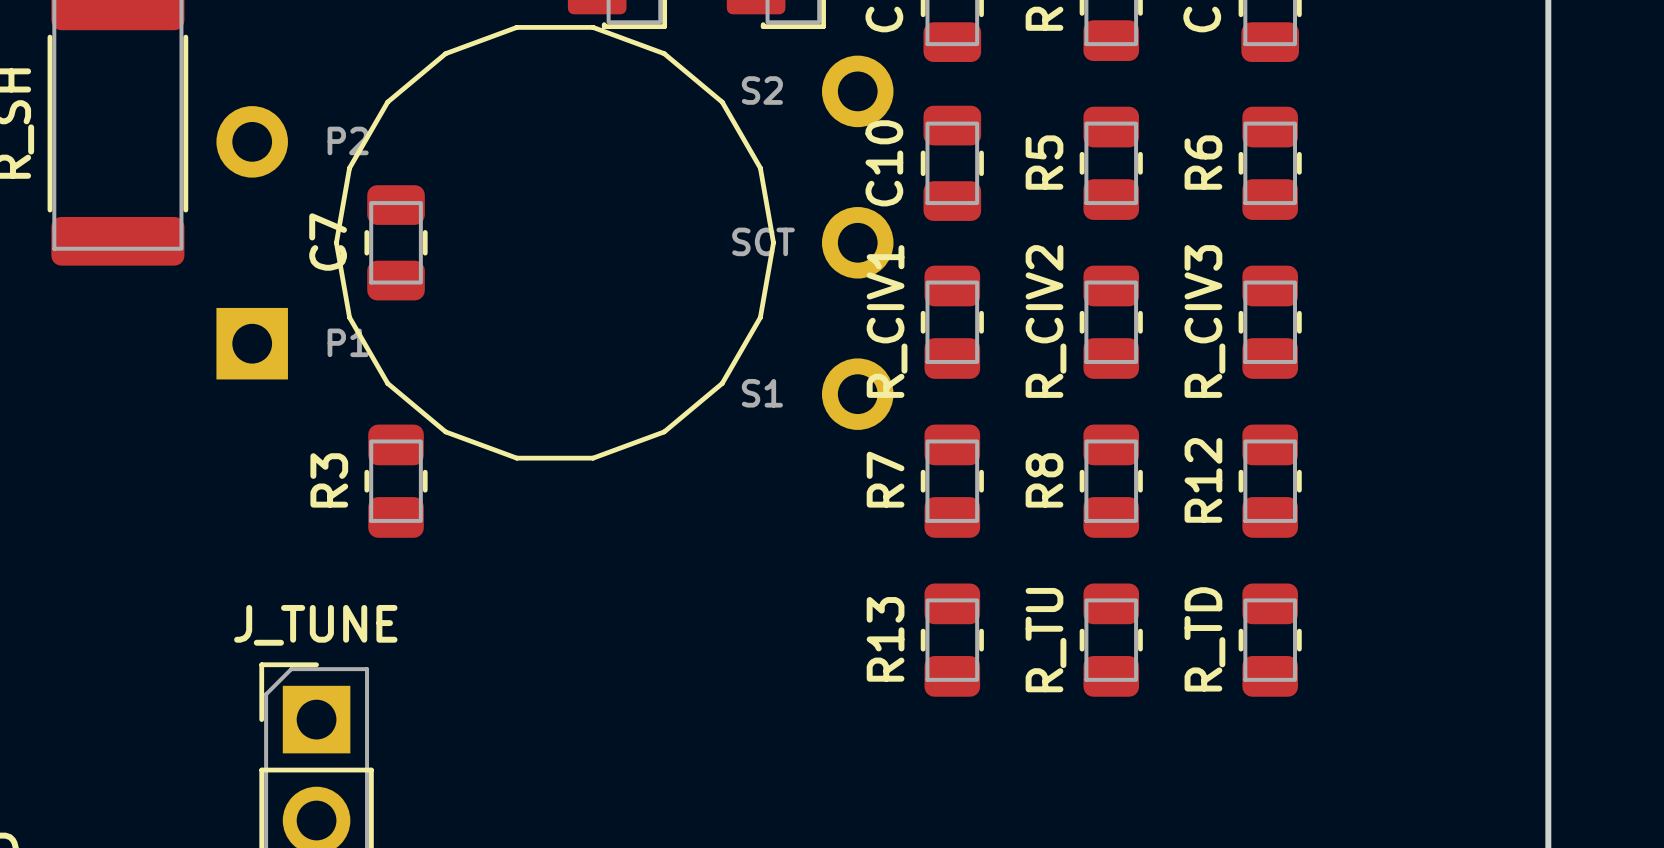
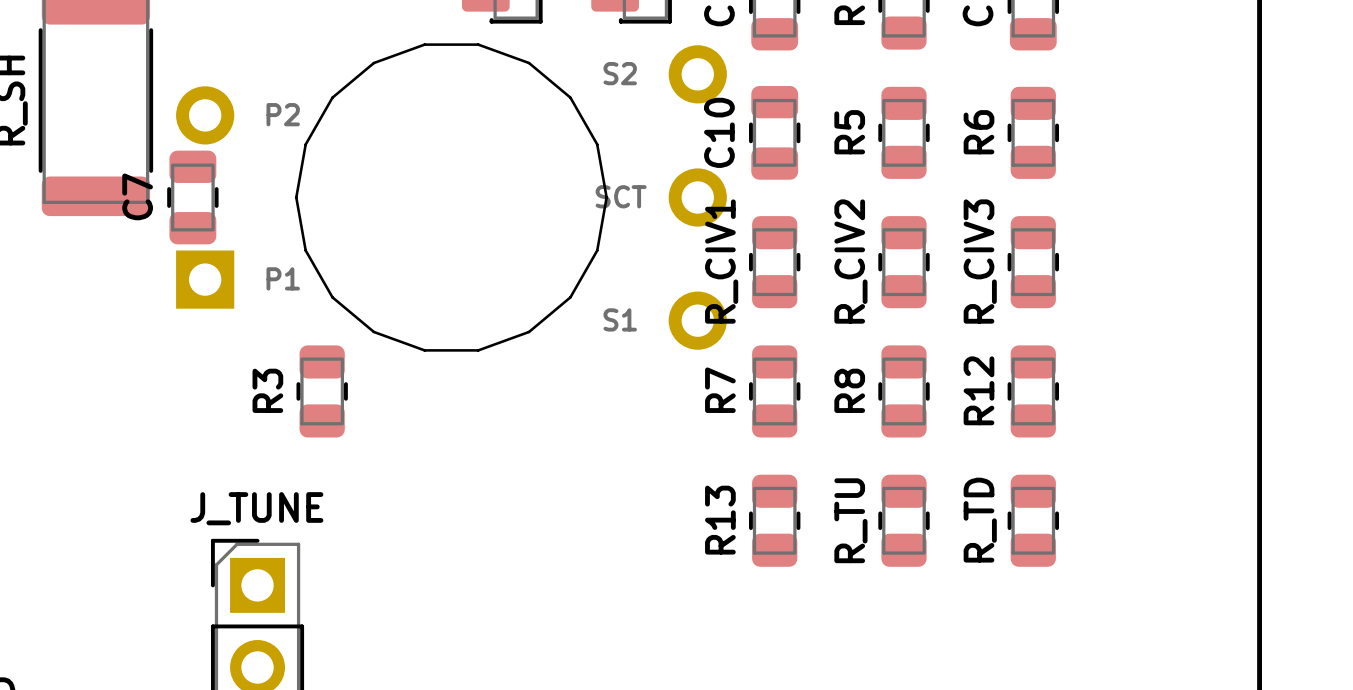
part footprint: [216, 25, 894, 461] -> [176, 43, 727, 352]
C7 position: (396, 242) -> (192, 197)

